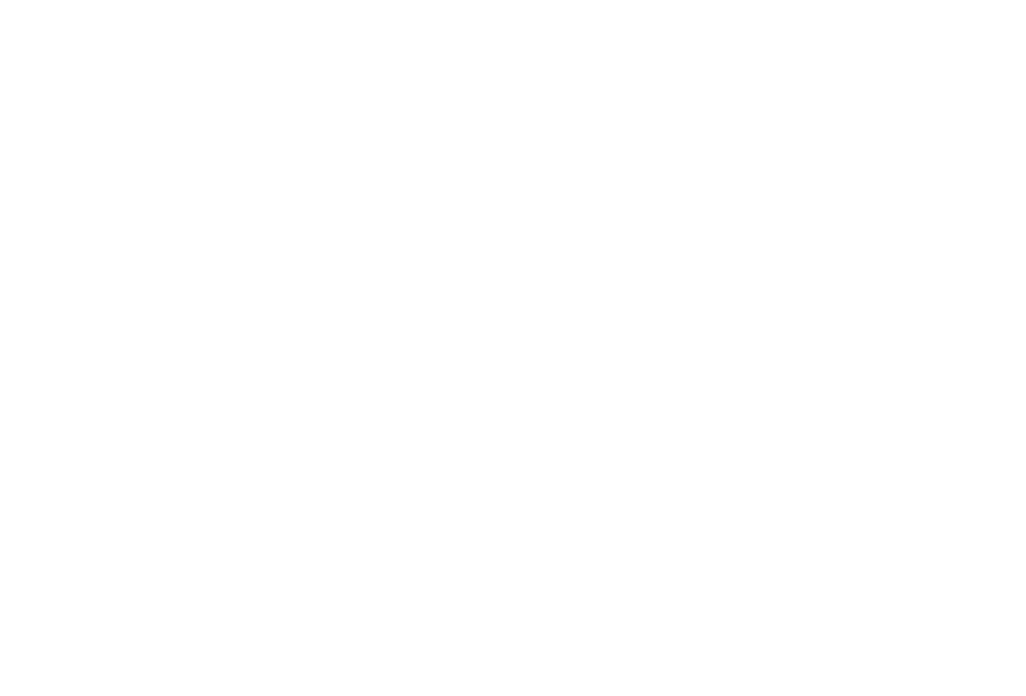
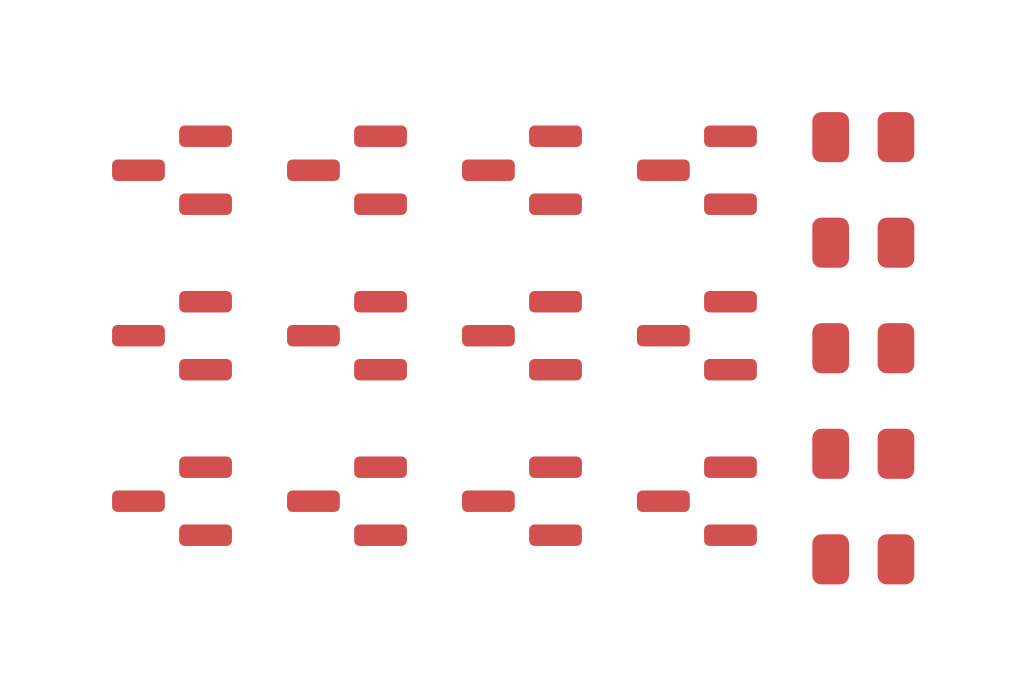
part: none -> (863, 137)
part: none -> (172, 170)
part: none -> (346, 170)
part: none -> (521, 170)
part: none -> (696, 170)
part: none -> (863, 242)
part: none -> (172, 335)
part: none -> (346, 335)
part: none -> (521, 335)
part: none -> (696, 335)
part: none -> (863, 348)
part: none -> (863, 453)
part: none -> (172, 501)
part: none -> (346, 501)
part: none -> (521, 501)
part: none -> (696, 501)
part: none -> (863, 559)

